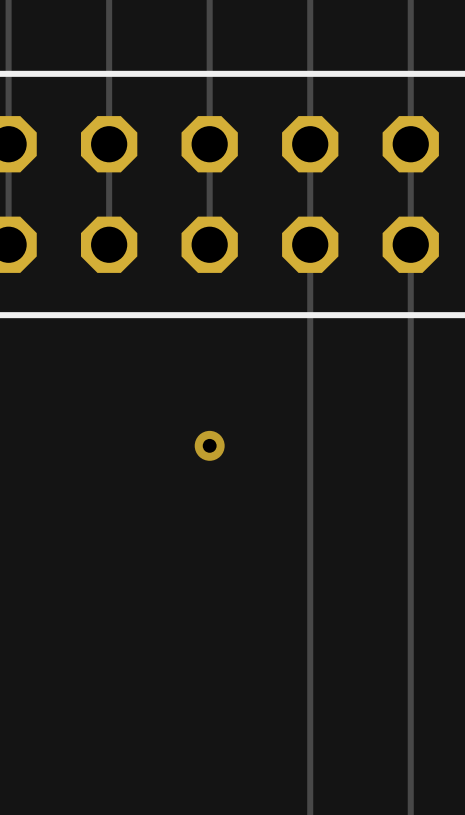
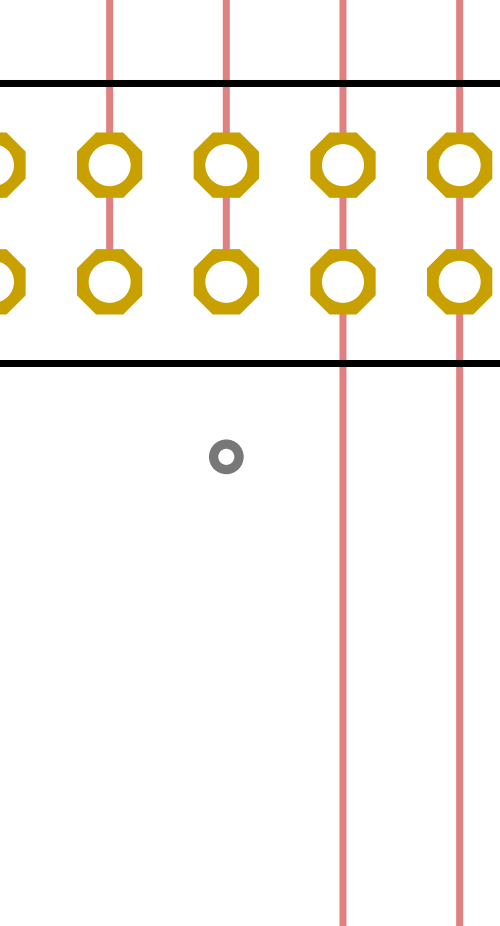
via position: (209, 445) -> (226, 456)

